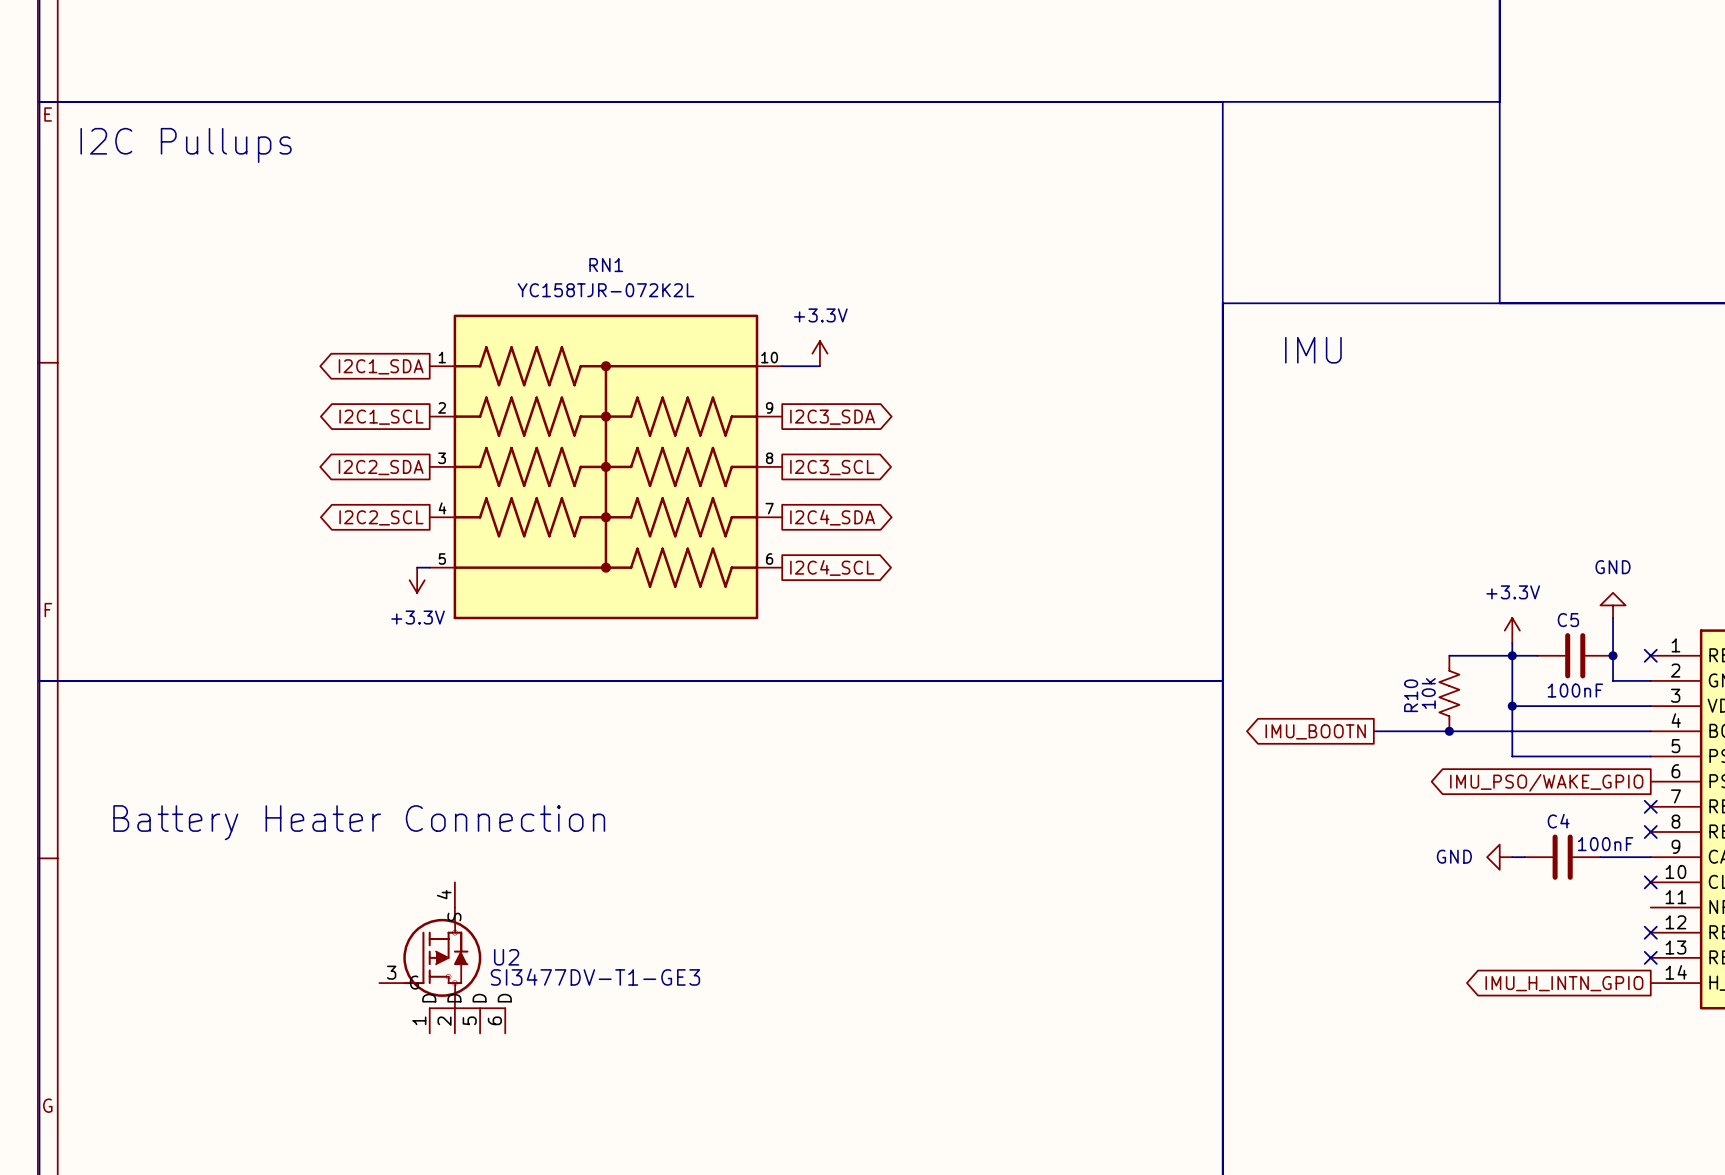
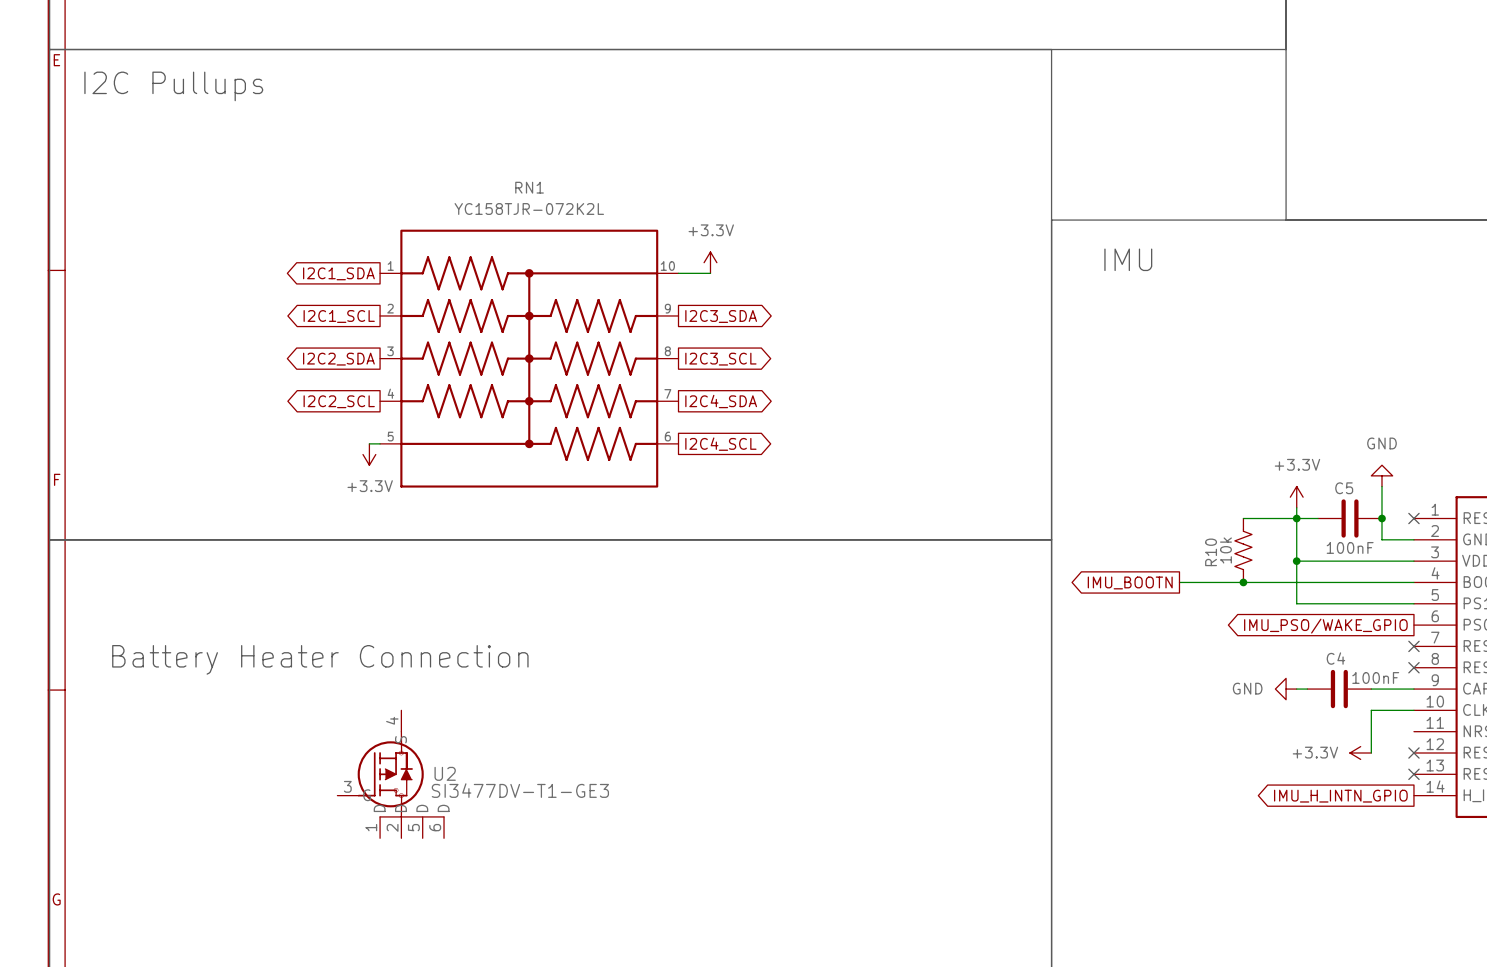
wire: none -> (1413, 710) (1371, 710) (1371, 753)
no-connect mark: (1650, 882) -> none
power symbol: none -> +3.3V (1360, 753)

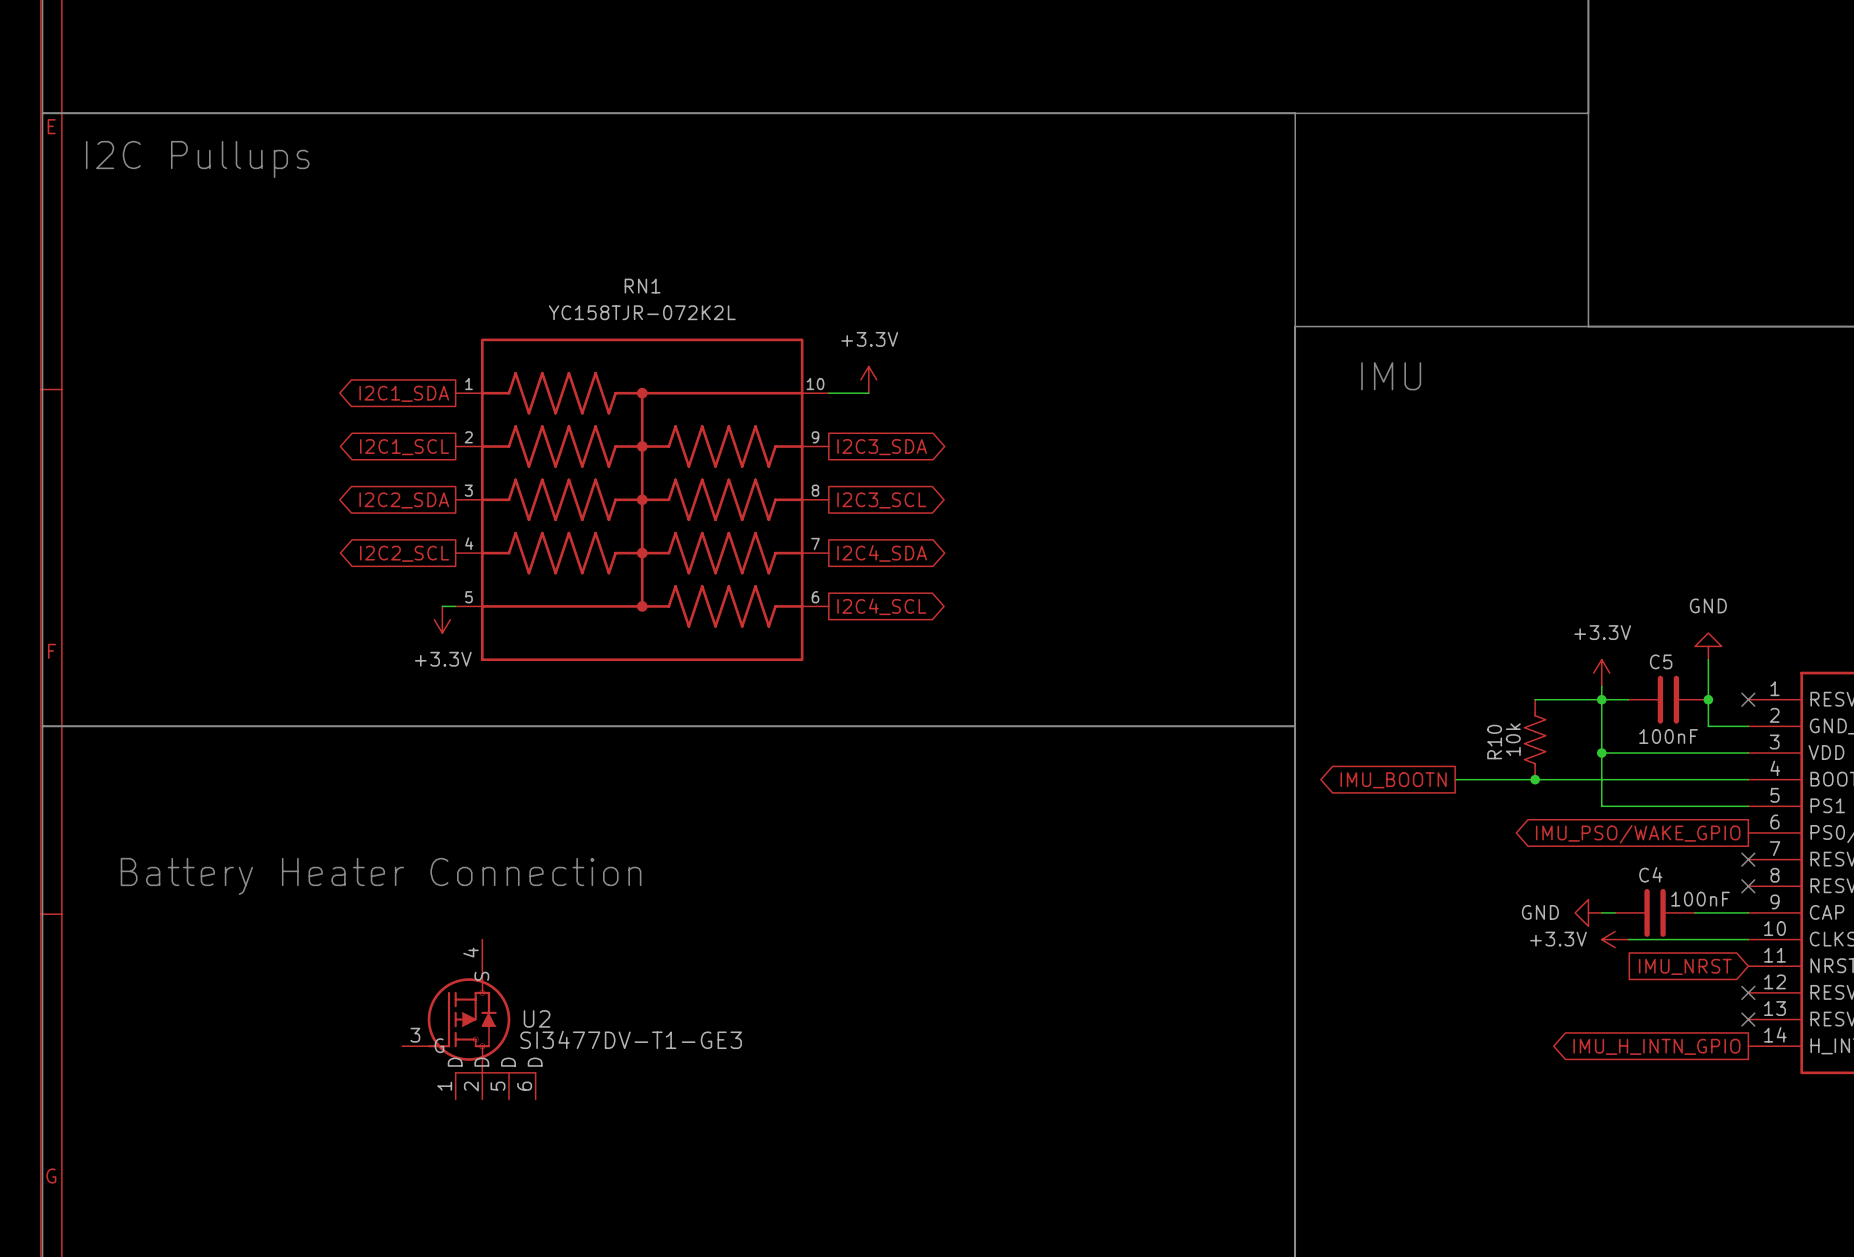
wire: (1371, 710) (1371, 753) -> (1695, 939) (1628, 939)
global label: none -> IMU_NRST (1685, 966)
power symbol position: +3.3V (1360, 753) -> +3.3V (1615, 939)

